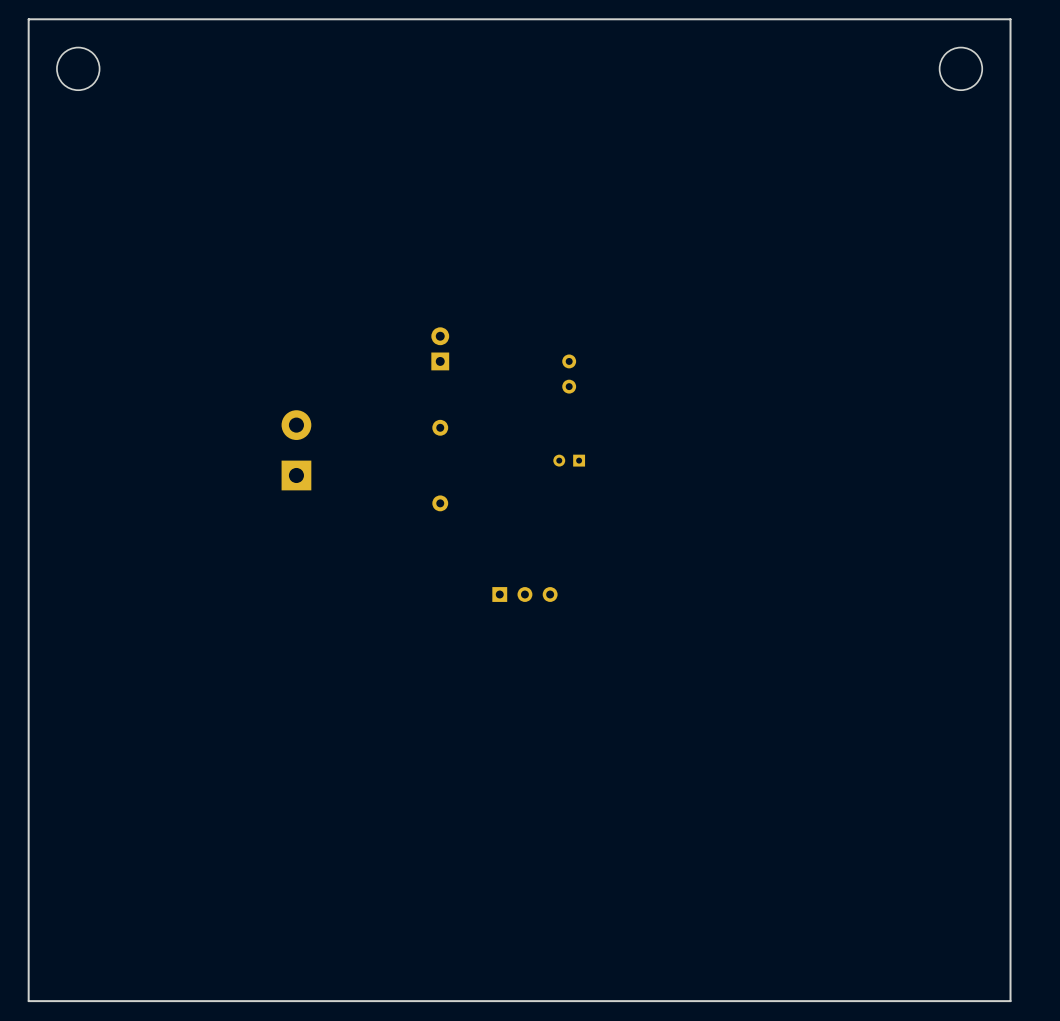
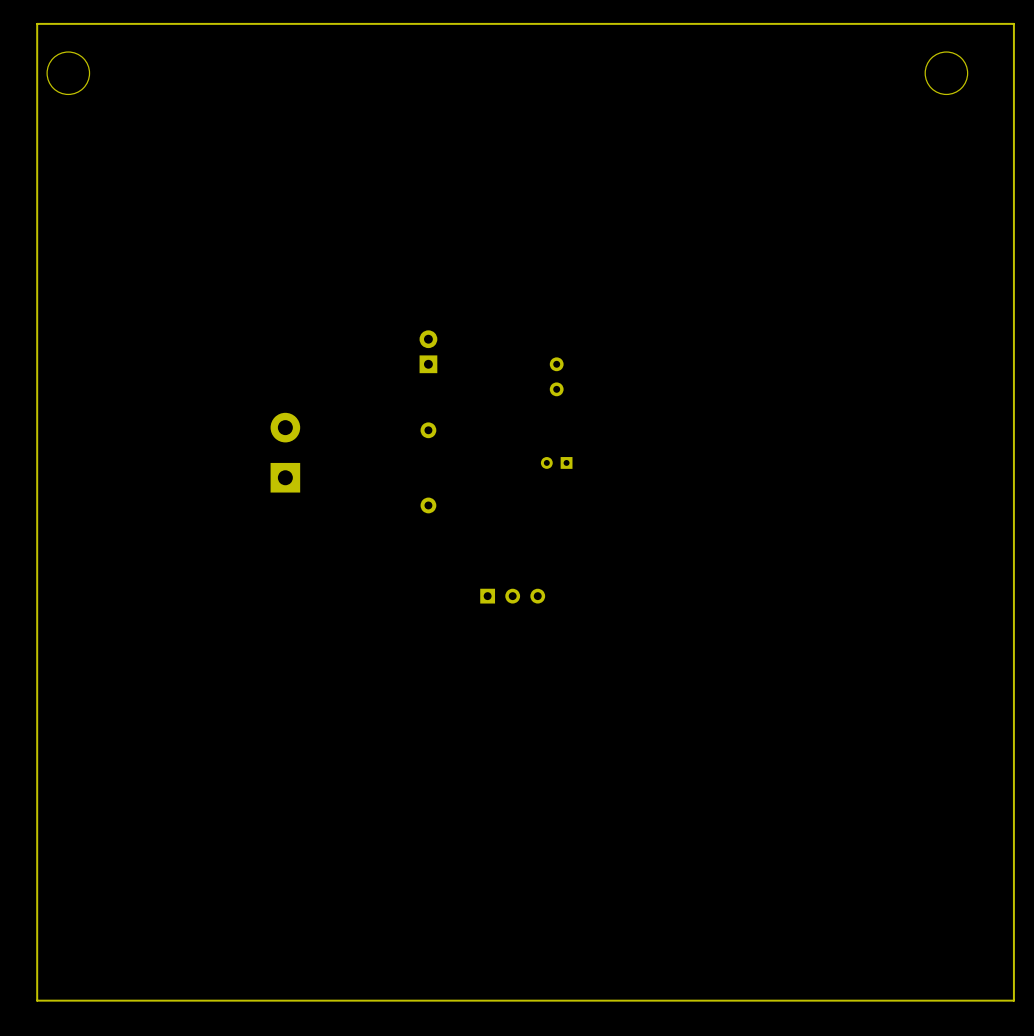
board edge: (46, 19) (28, 19) (28, 1001) (46, 1001) -> (37, 23) (37, 1000)
board edge: (1010, 19) (1010, 1001) -> (995, 23) (1013, 23) (1013, 1000) (995, 1000)

